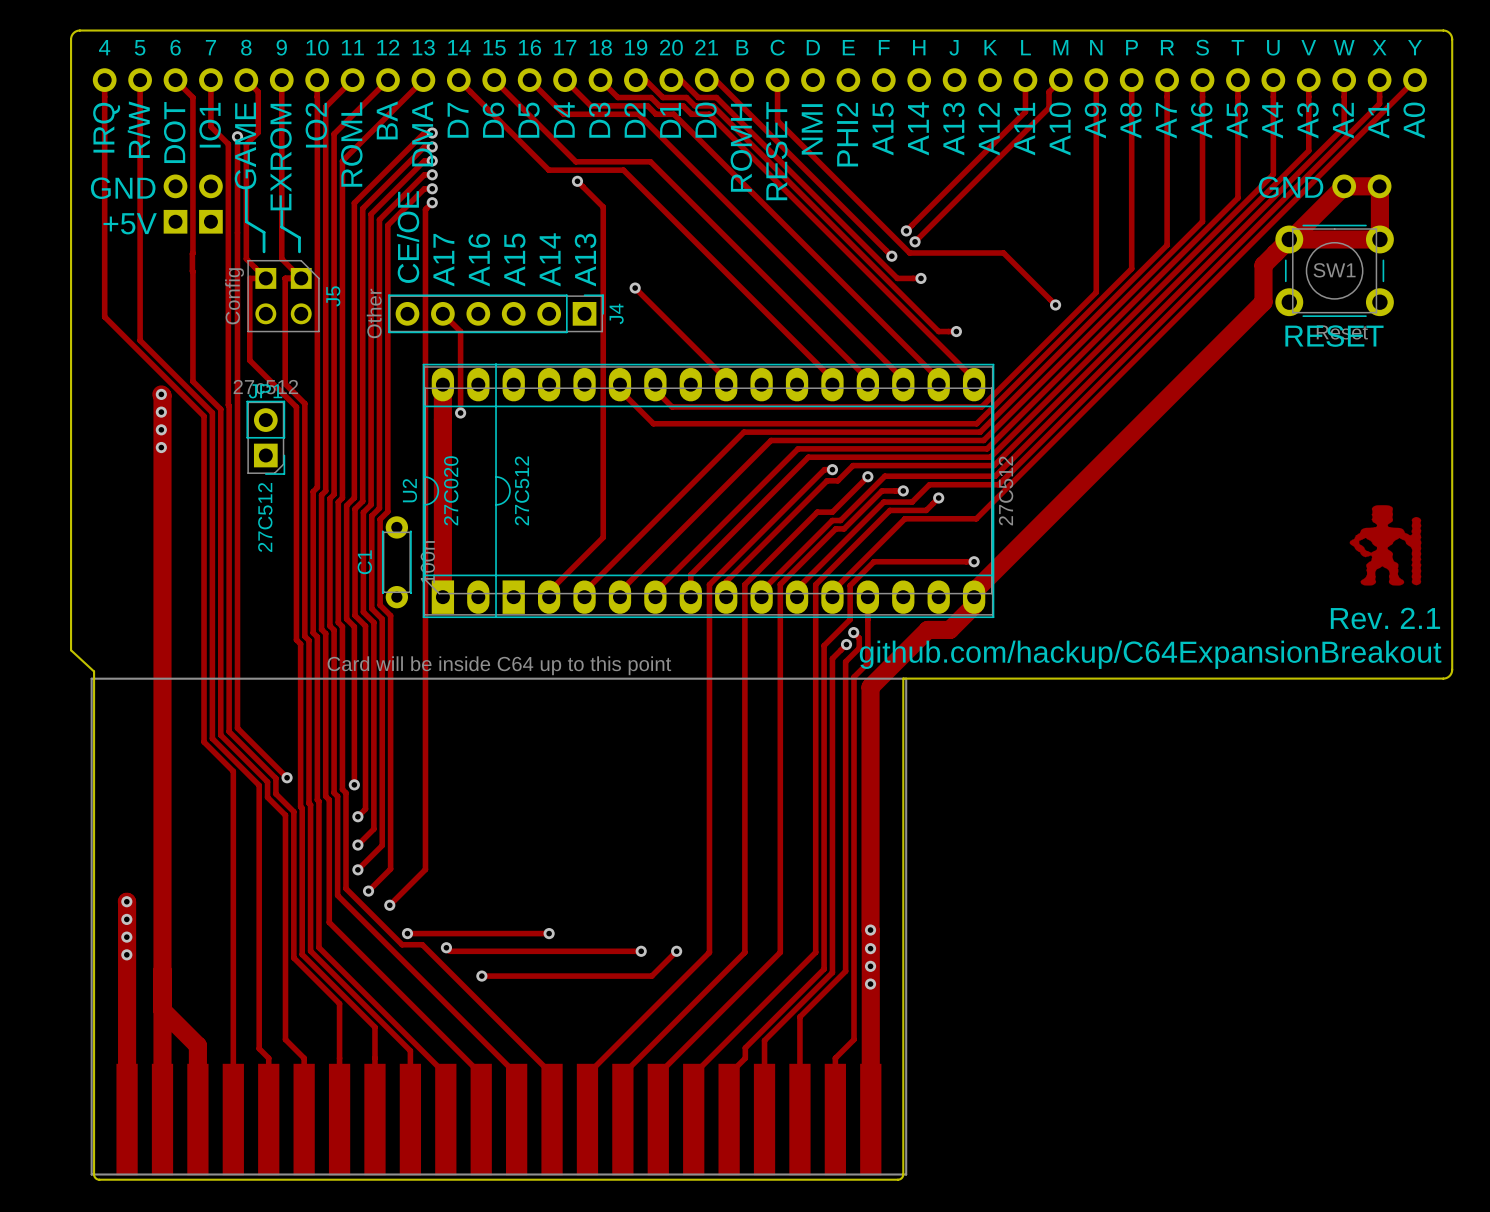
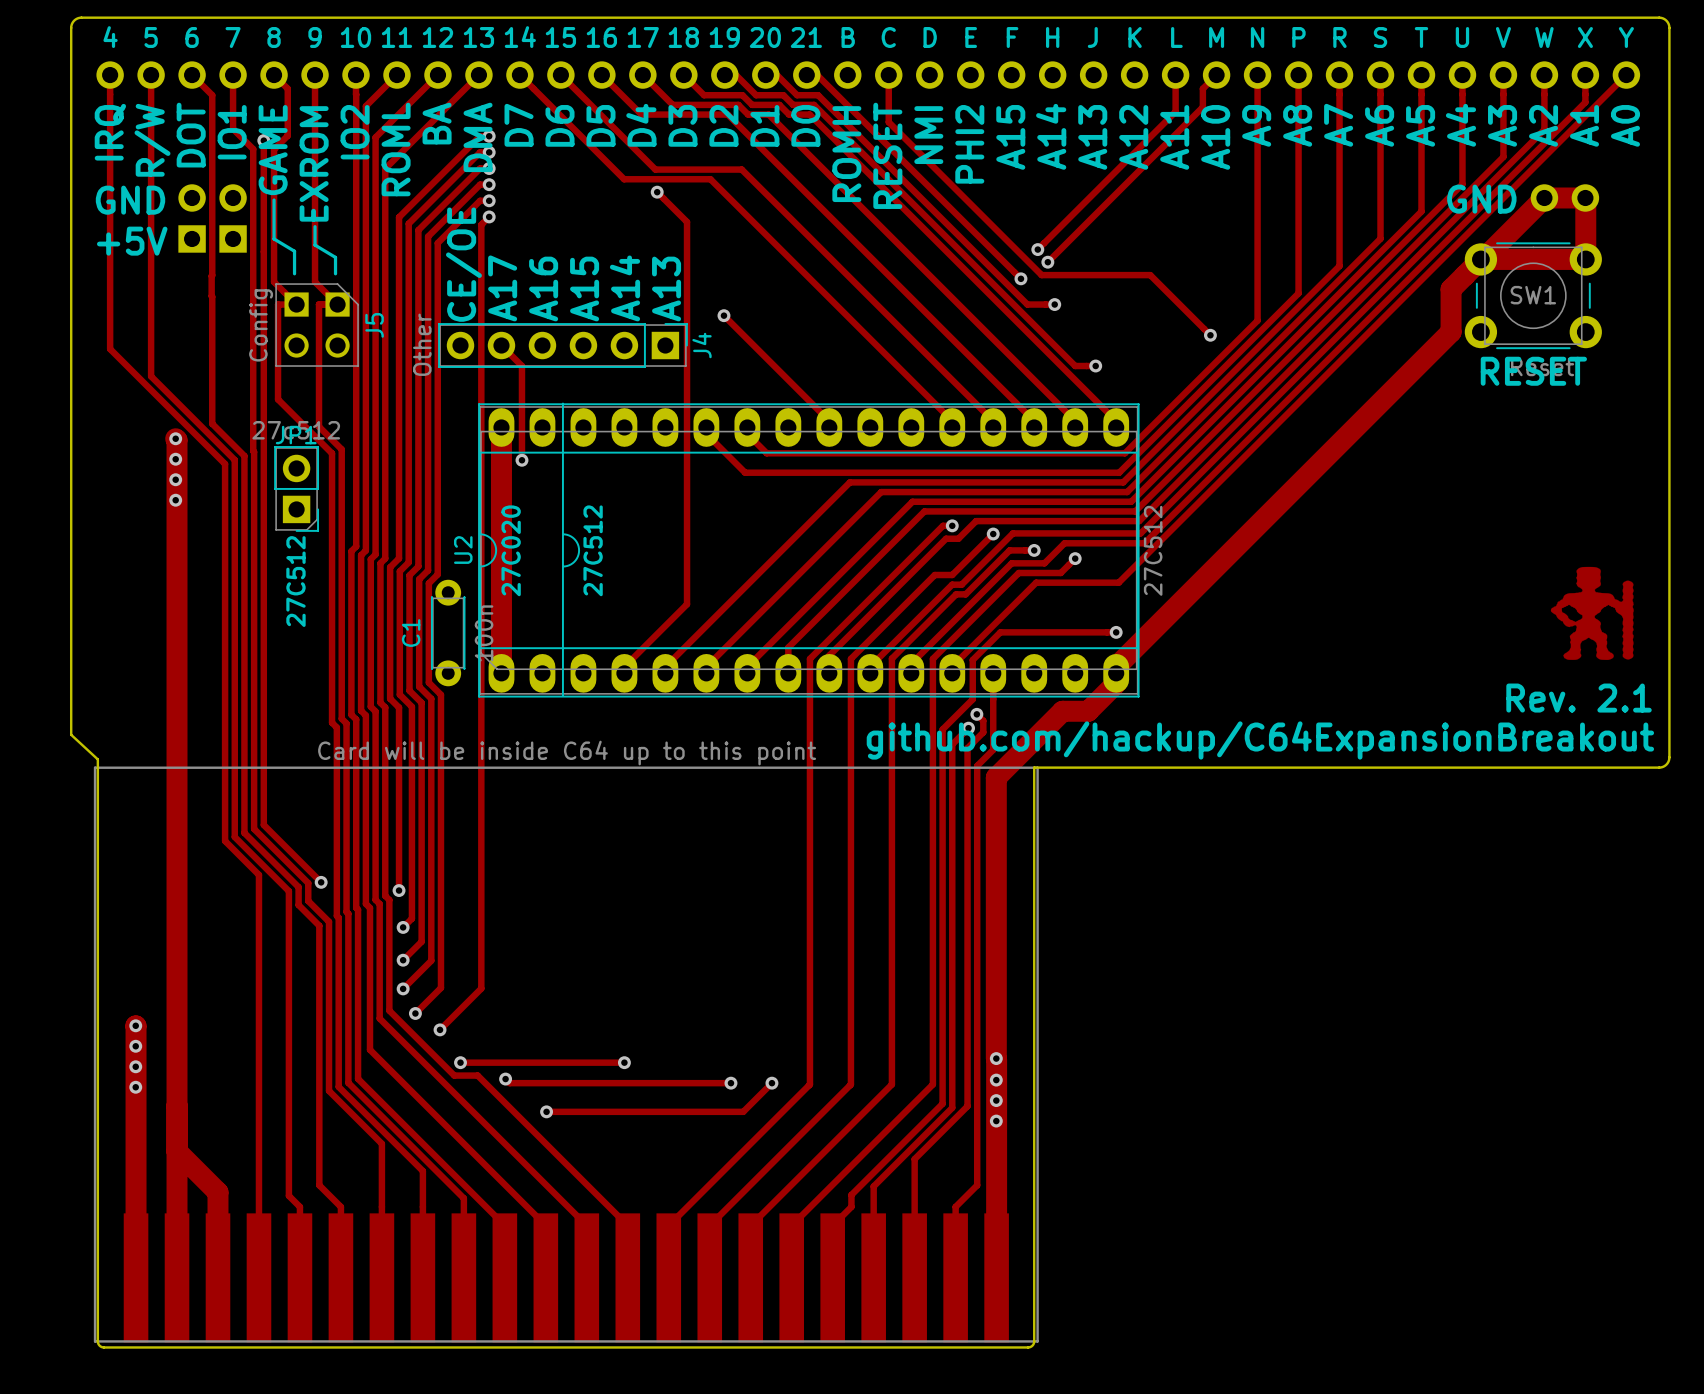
U2 footprint: [422, 363, 995, 619] -> [478, 402, 1140, 698]

